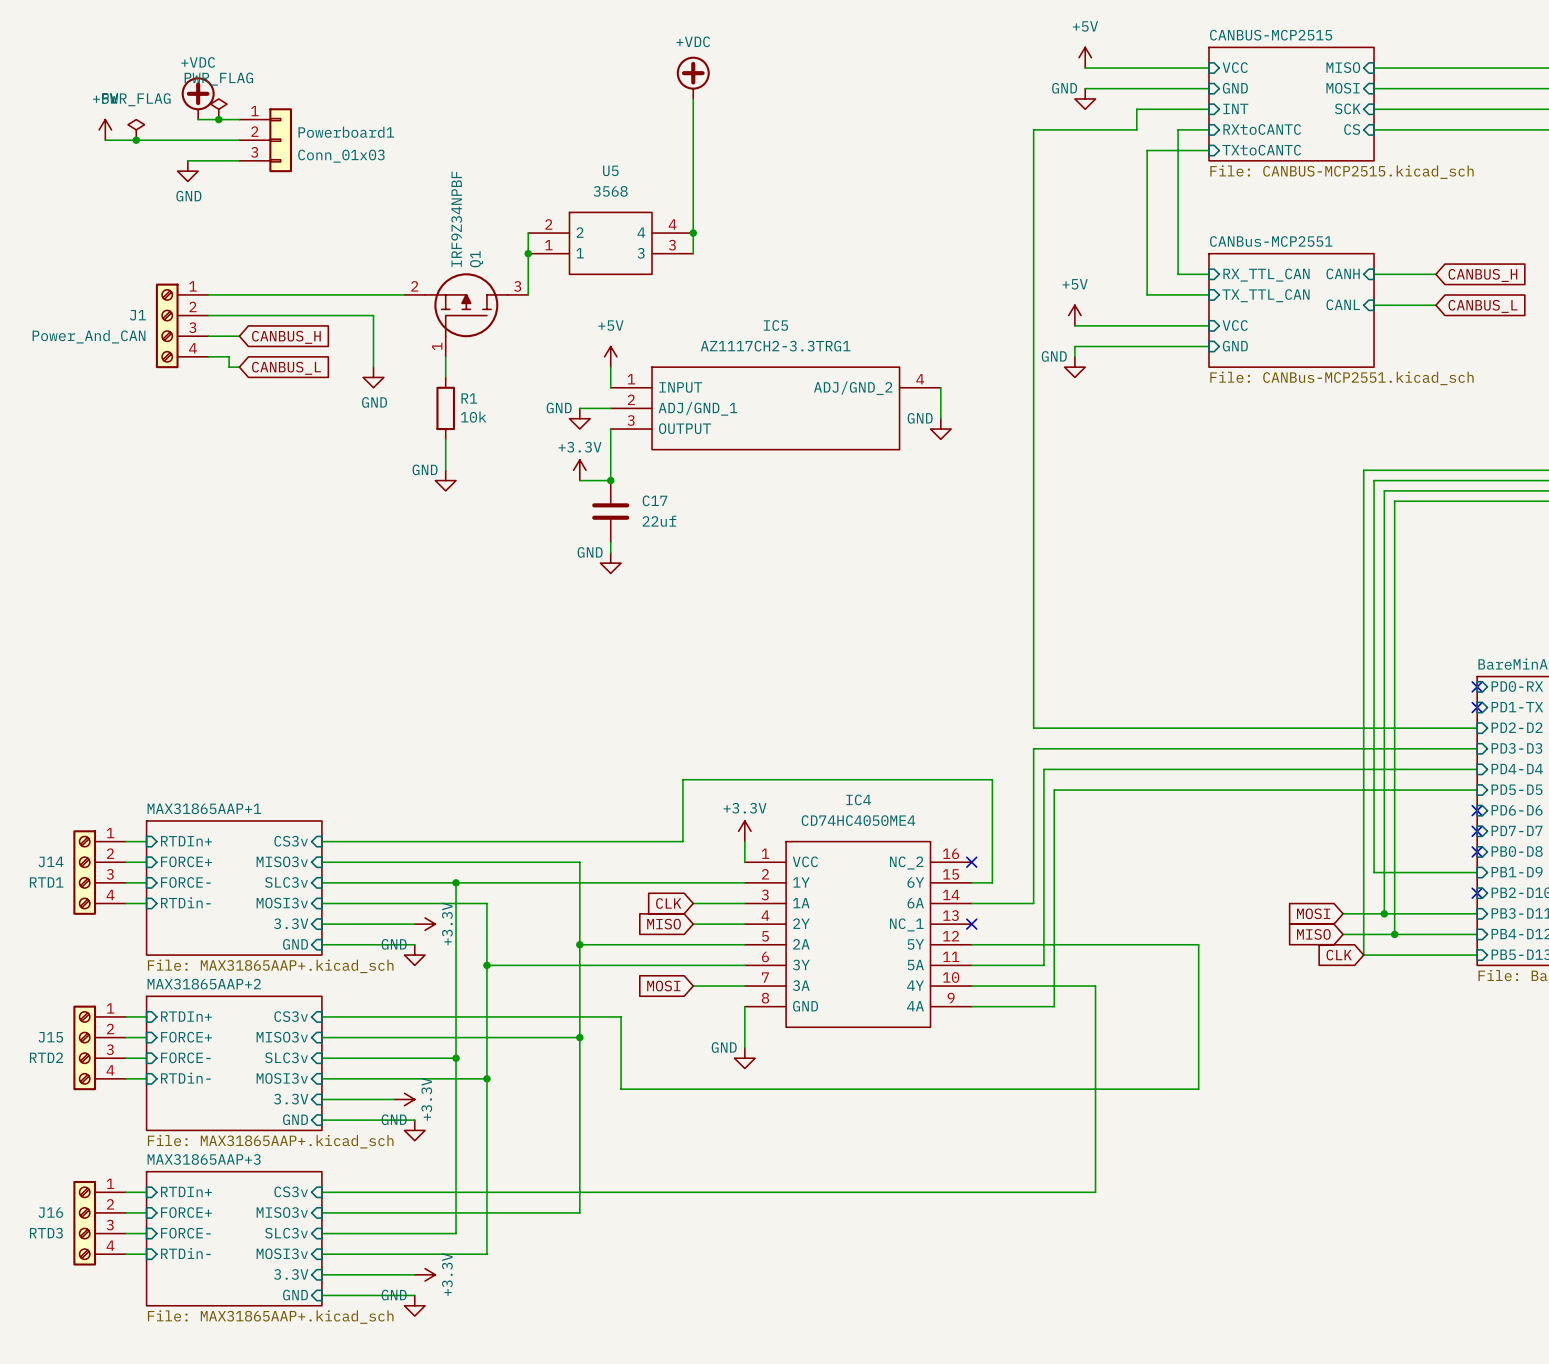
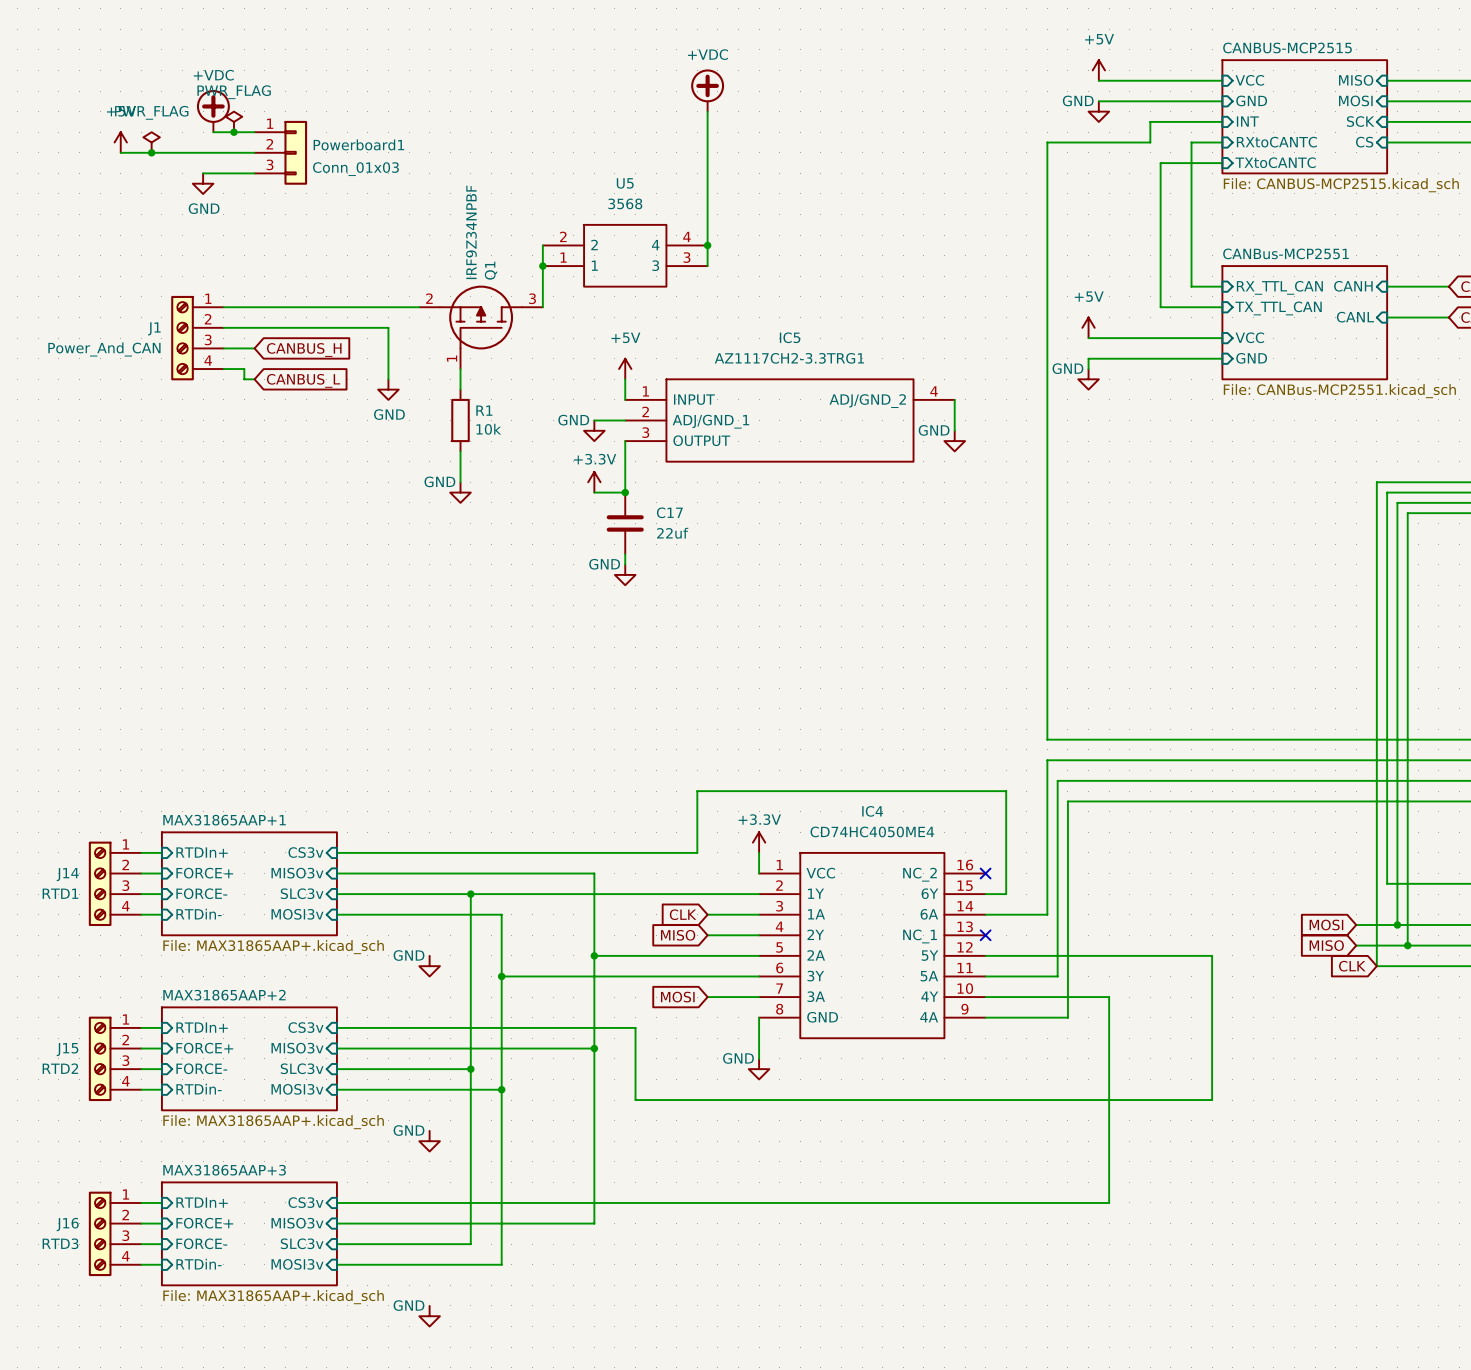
sheet MAX31865AAP+1 shape: [145, 820, 323, 956] -> [161, 831, 338, 936]
sheet pin: 3.3V (291, 923) -> none
wire: (321, 924) (414, 924) -> none
power symbol: +3.3V (425, 924) -> none
sheet pin: GND (295, 944) -> none
wire: (321, 944) (414, 944) -> none
sheet MAX31865AAP+2 shape: [145, 995, 323, 1132] -> [161, 1006, 338, 1111]
sheet pin: 3.3V (291, 1099) -> none
wire: (321, 1099) (394, 1099) -> none
power symbol: +3.3V (404, 1099) -> none
sheet pin: GND (295, 1119) -> none
wire: (321, 1120) (414, 1120) -> none
sheet MAX31865AAP+3 shape: [145, 1171, 323, 1307] -> [161, 1181, 338, 1286]
sheet pin: 3.3V (291, 1274) -> none
wire: (321, 1274) (414, 1274) -> none
power symbol: +3.3V (425, 1274) -> none
sheet pin: GND (295, 1295) -> none
wire: (321, 1295) (414, 1295) -> none

